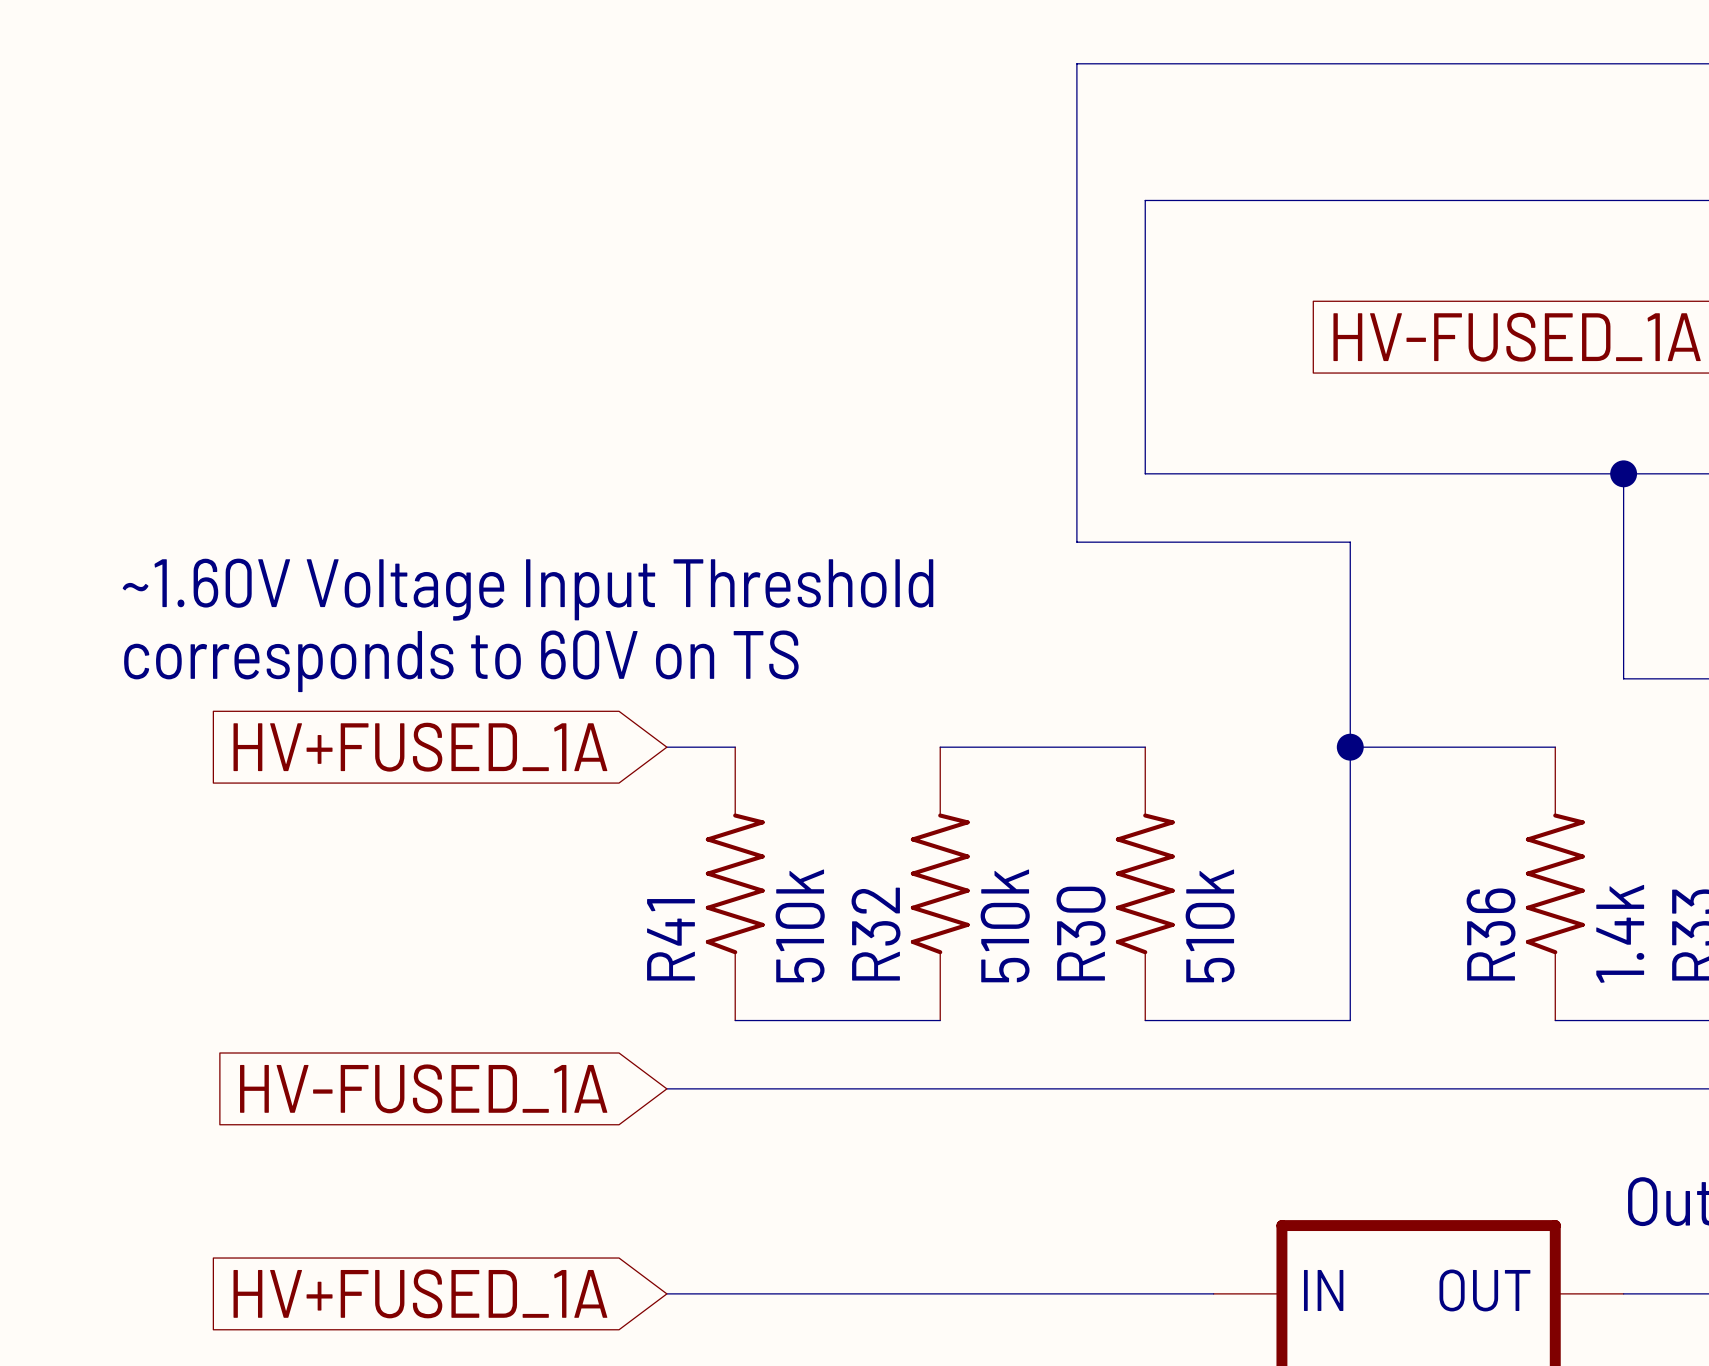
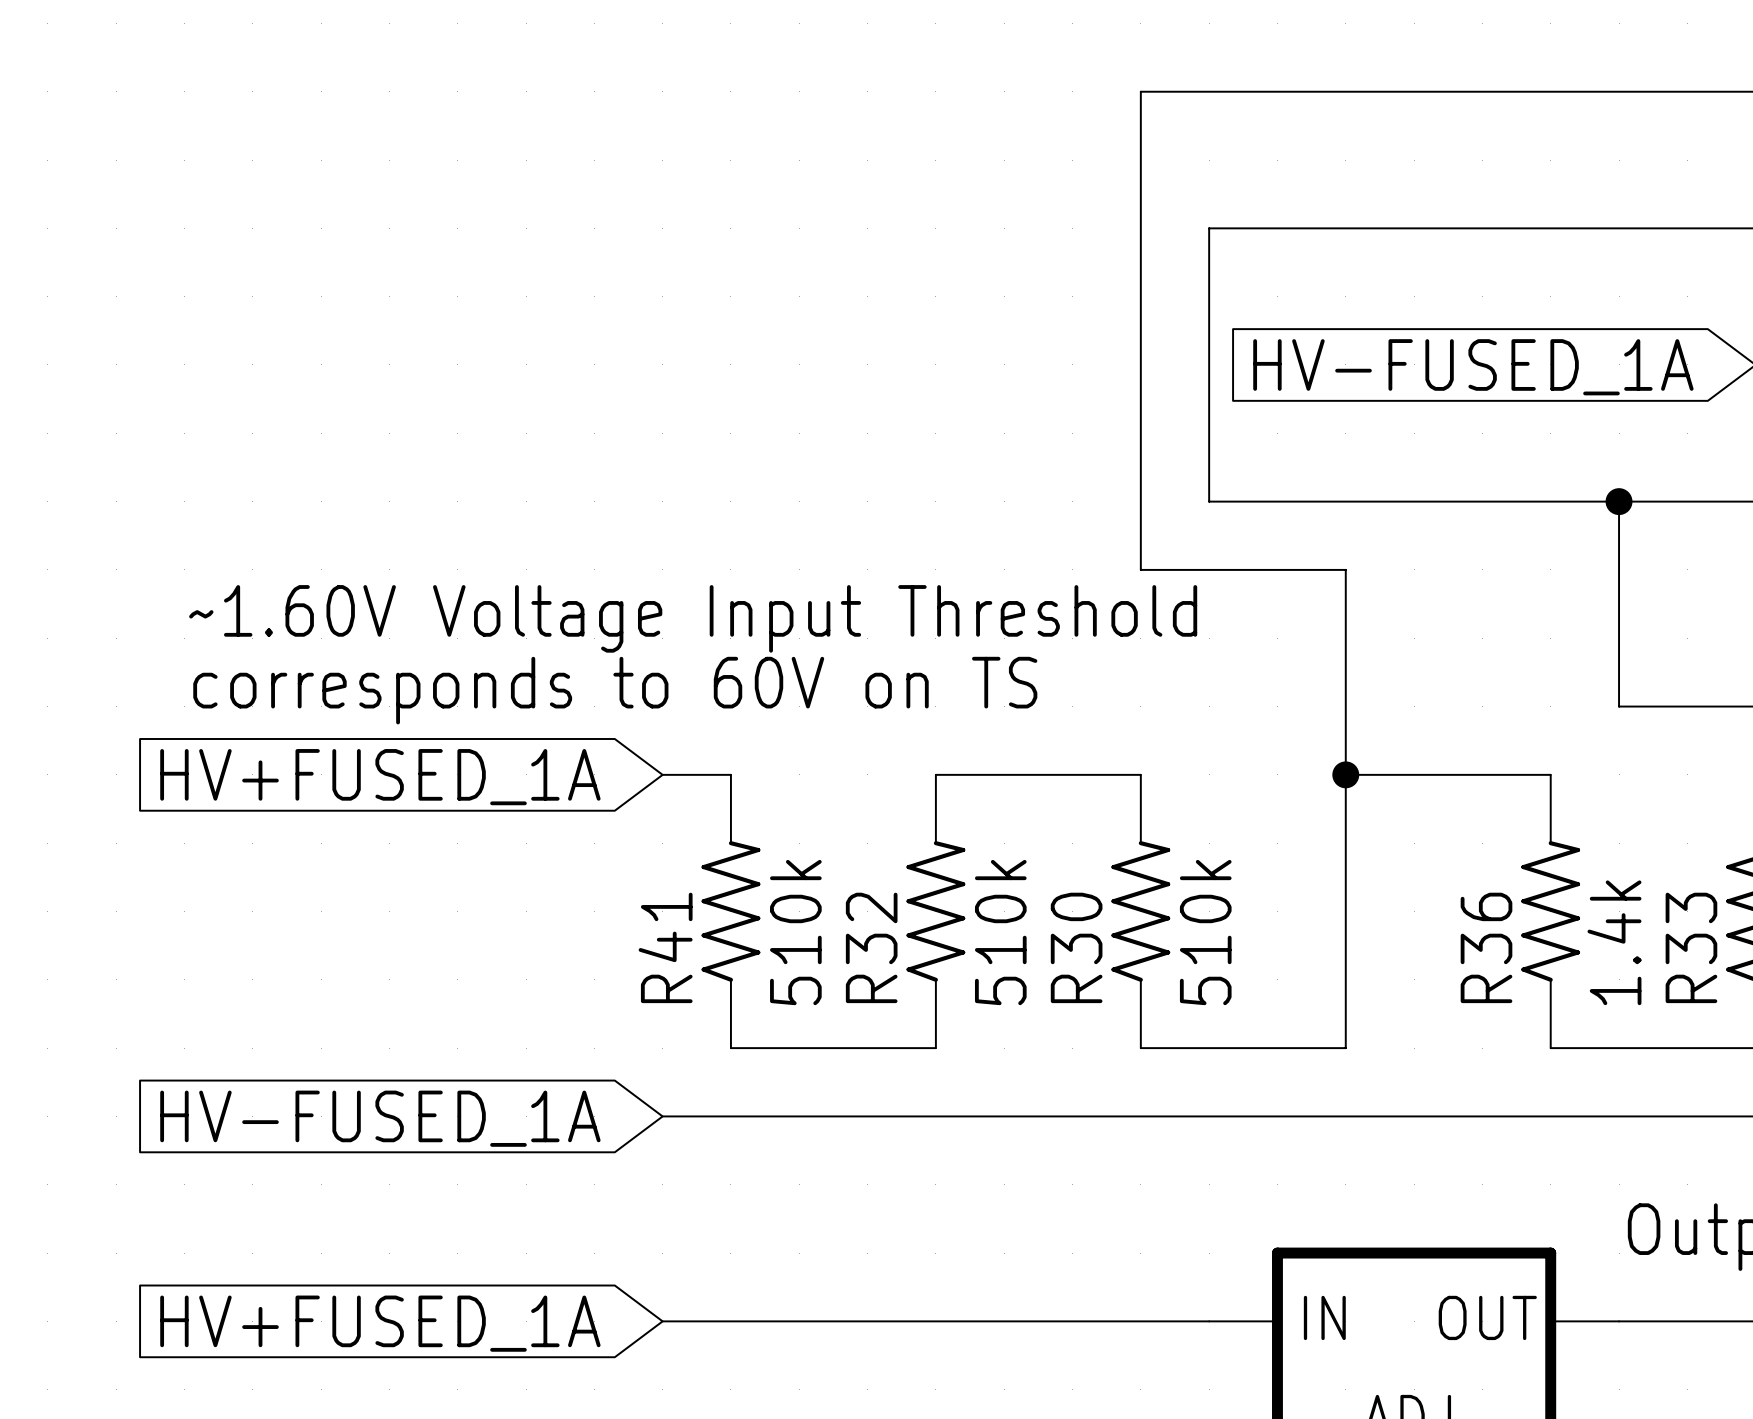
wire: (1145, 63) (1076, 63) (1076, 542) (1145, 542) -> none
wire: (1145, 200) (1213, 200) -> (1140, 228) (1140, 91)
wire: none -> (1209, 228) (1209, 501)
wire: (1145, 473) (1213, 473) -> (1140, 501) (1140, 569)
text position: ~1.60V Voltage Input Threshold (527, 589) -> ~1.60V Voltage Input Threshold (693, 618)
text position: corresponds to 60V on TS (461, 661) -> corresponds to 60V on TS (615, 690)

